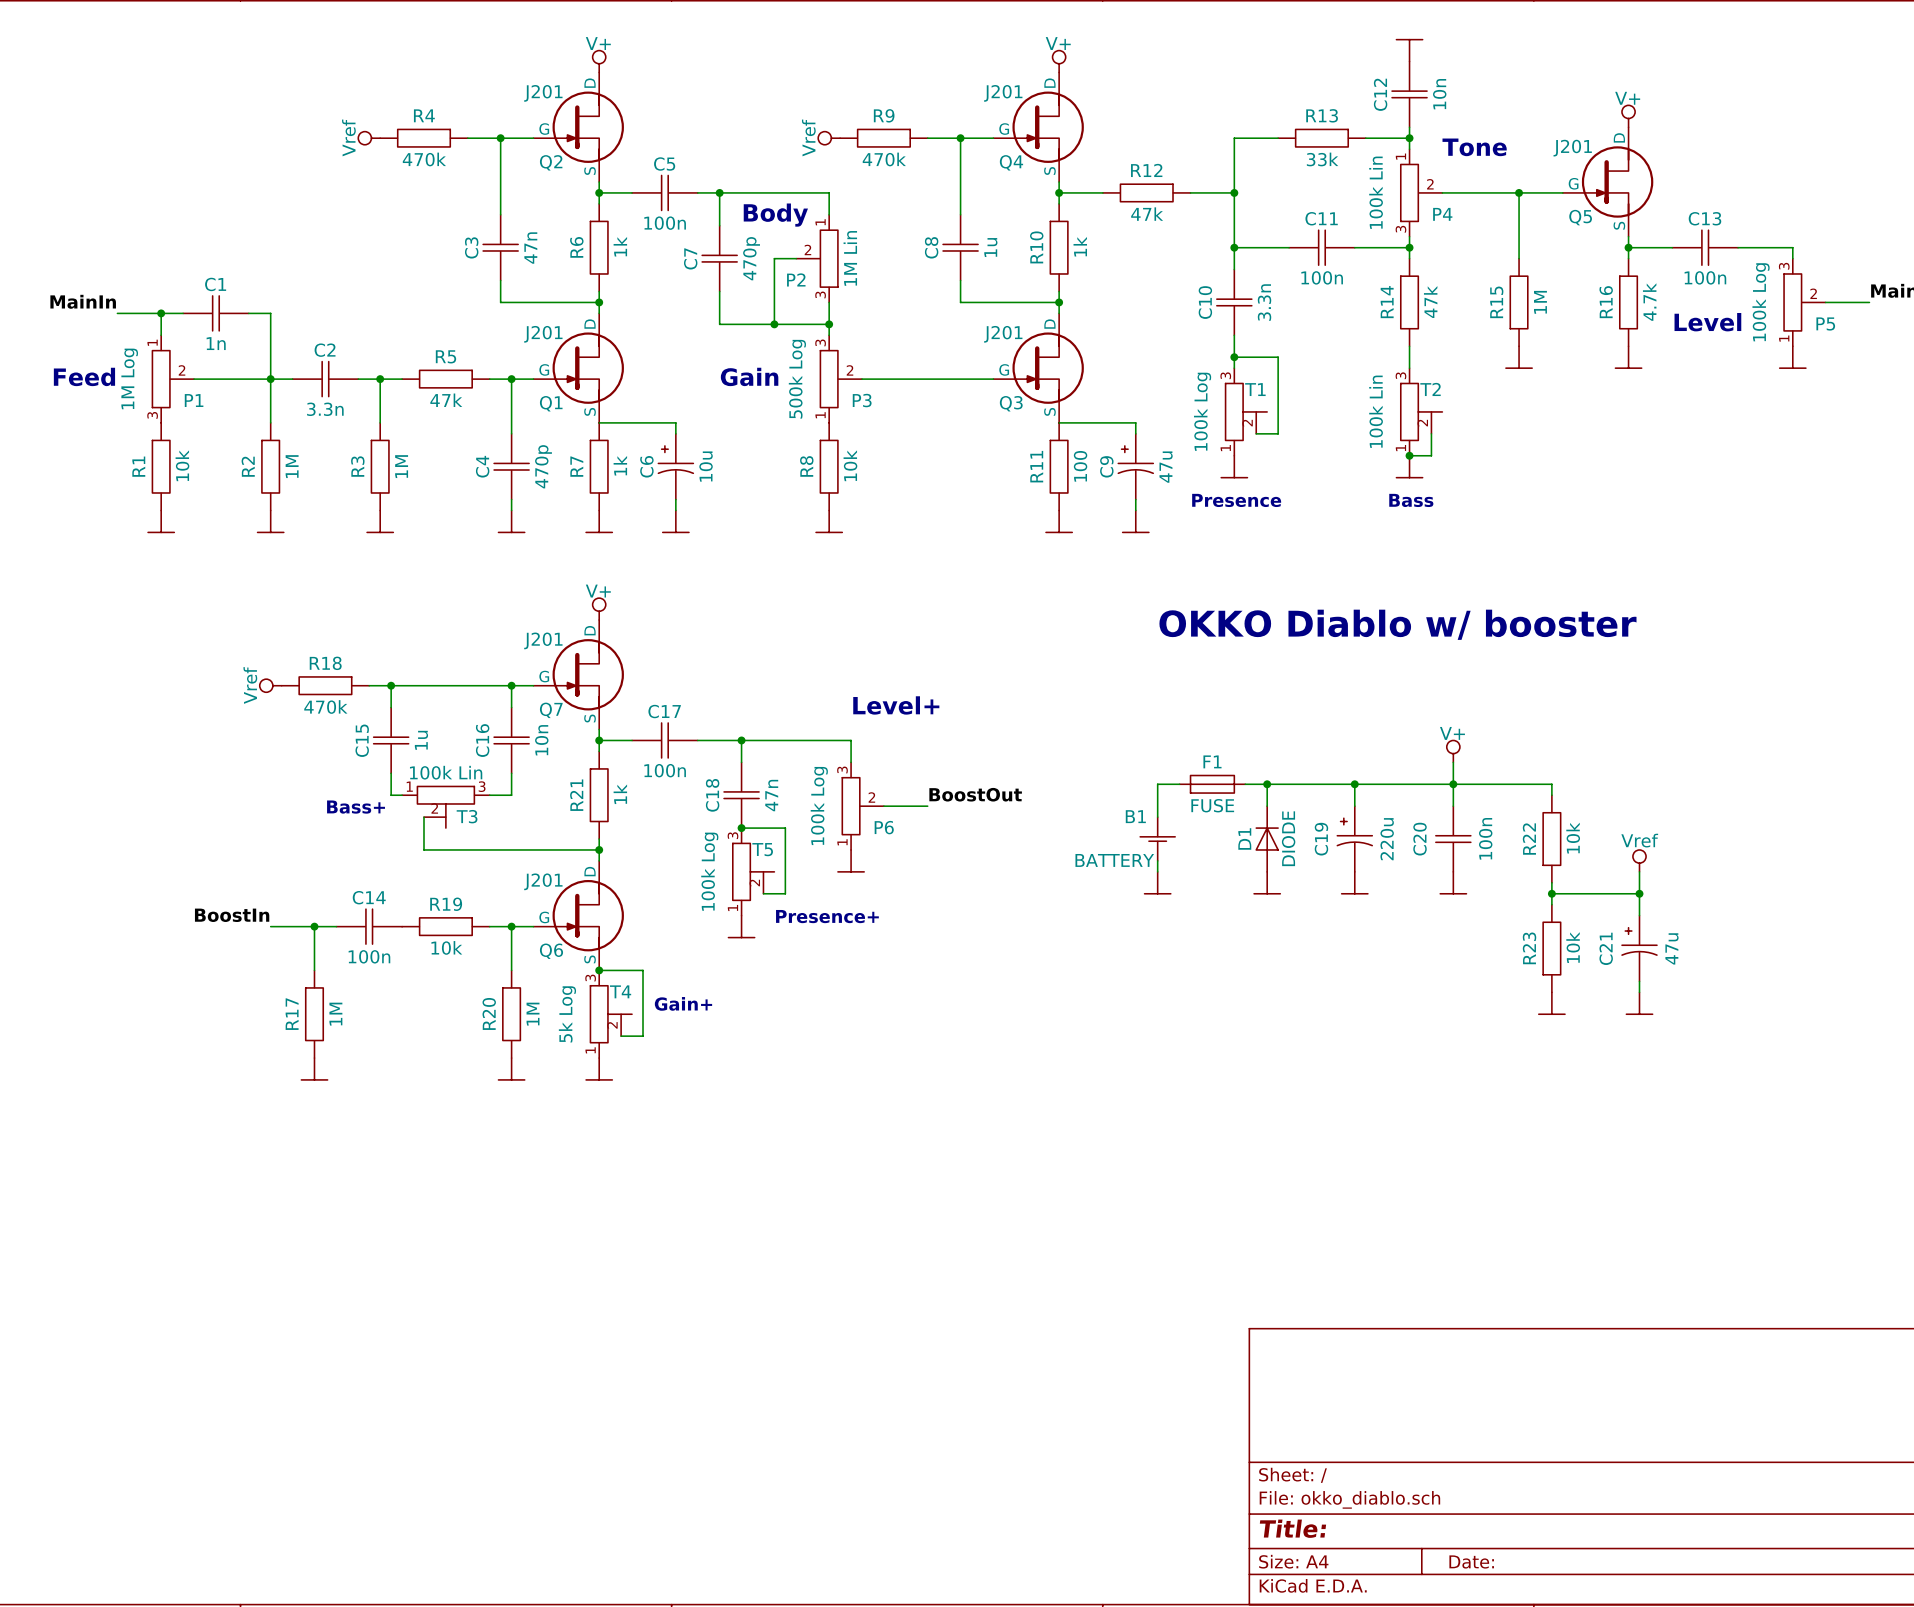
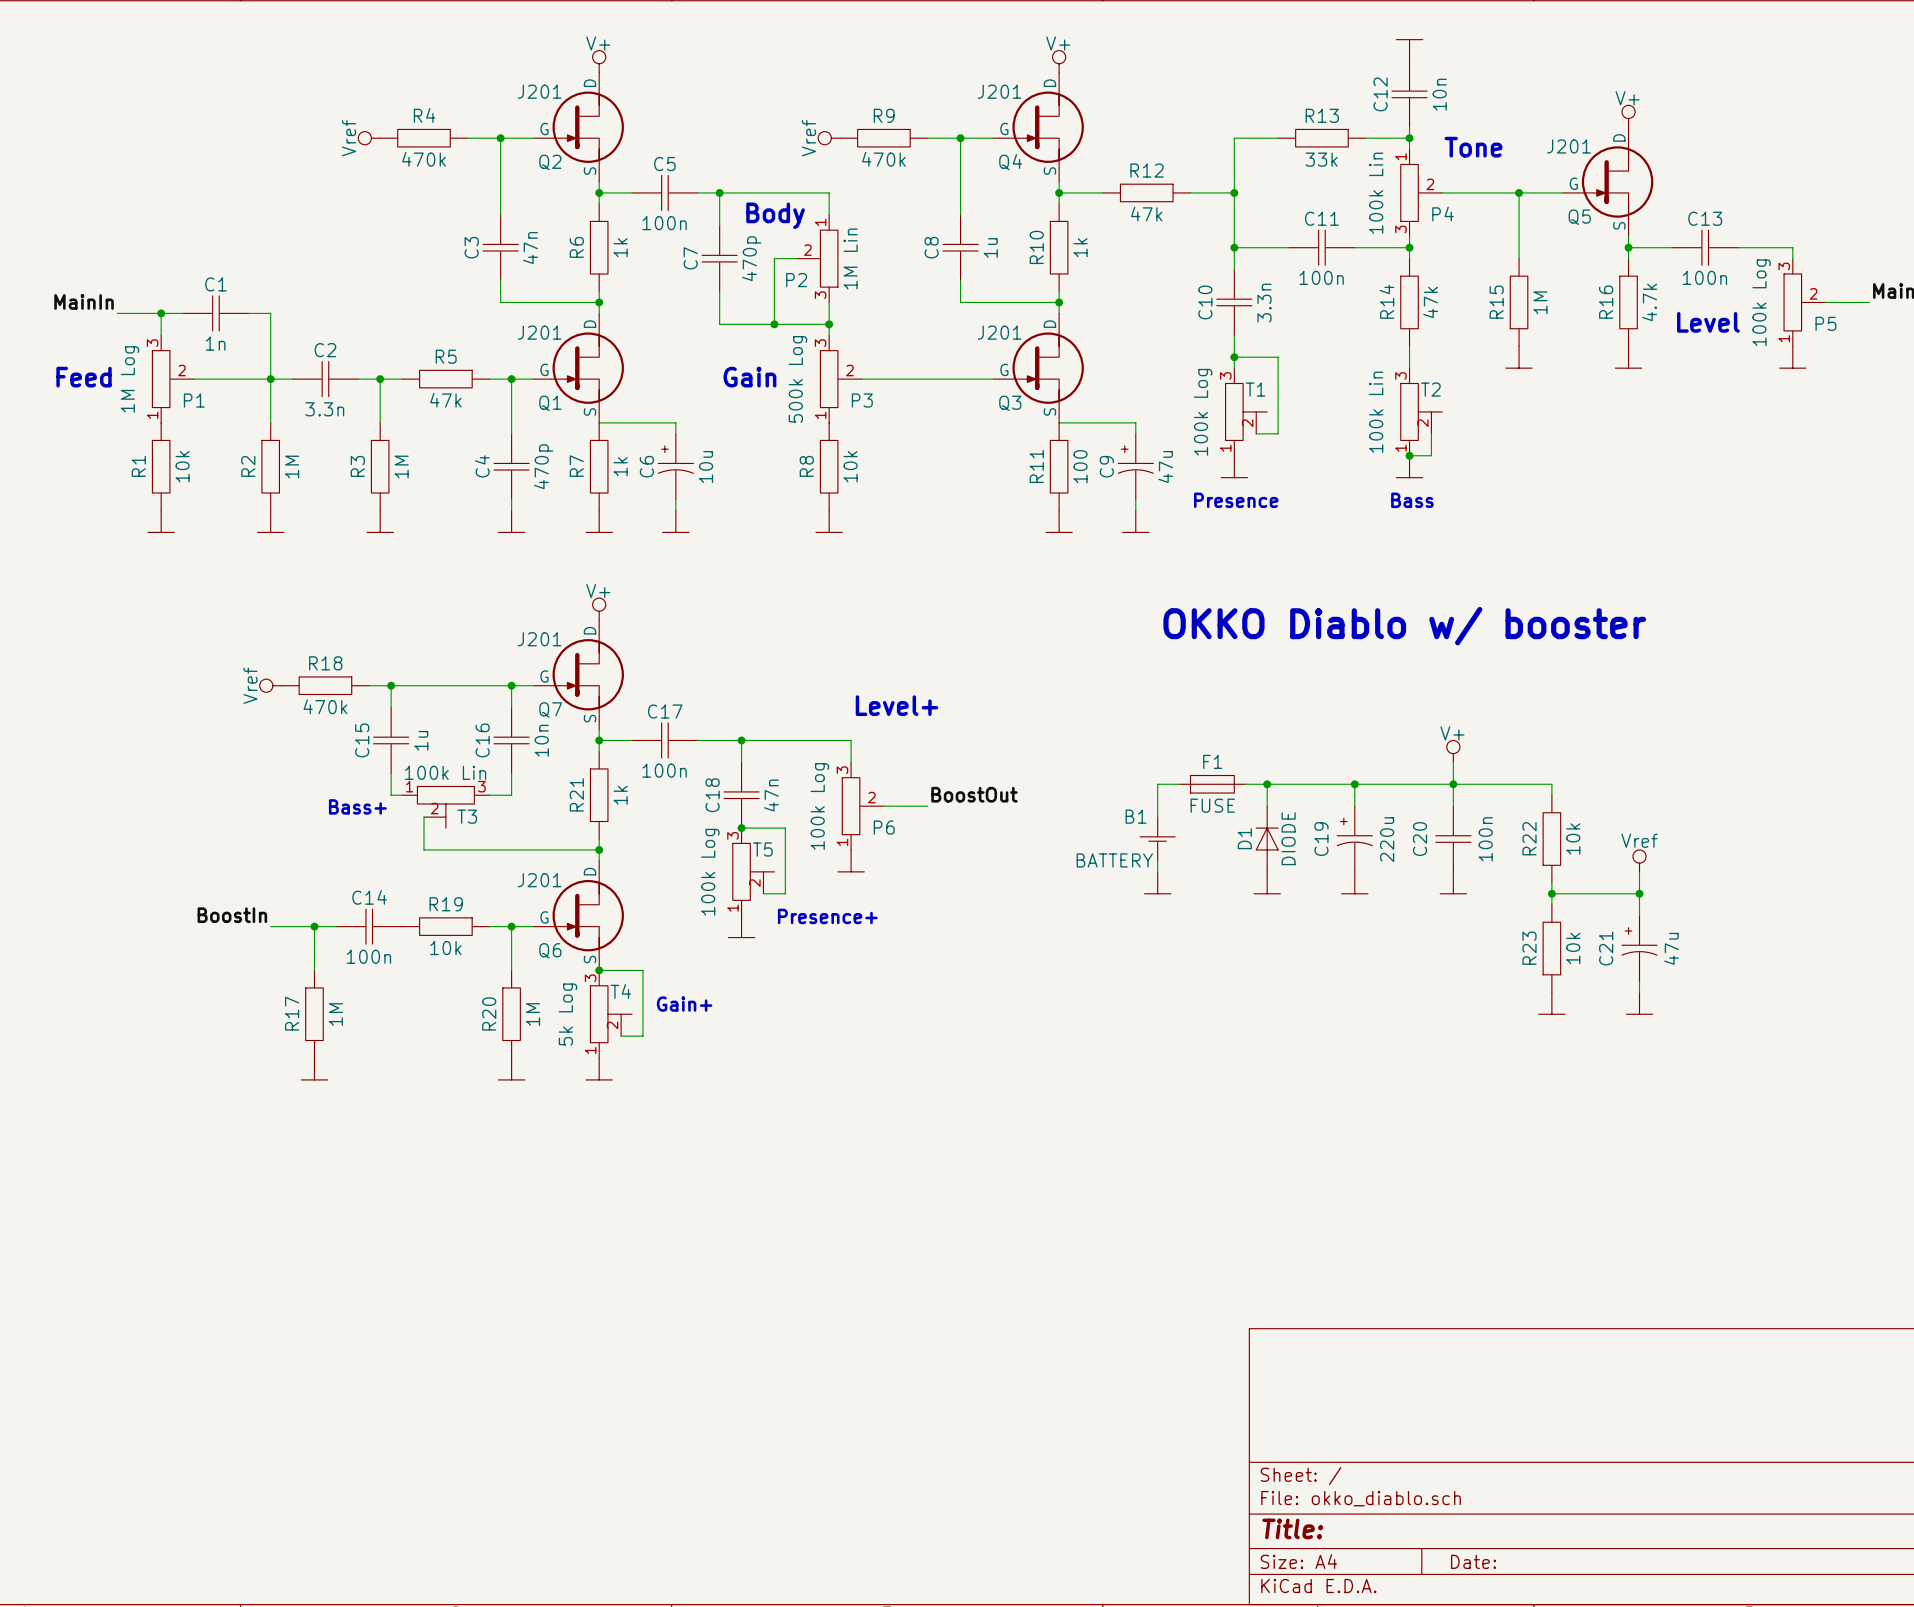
P1 flip: as is (161, 379) -> up-down (161, 379)

